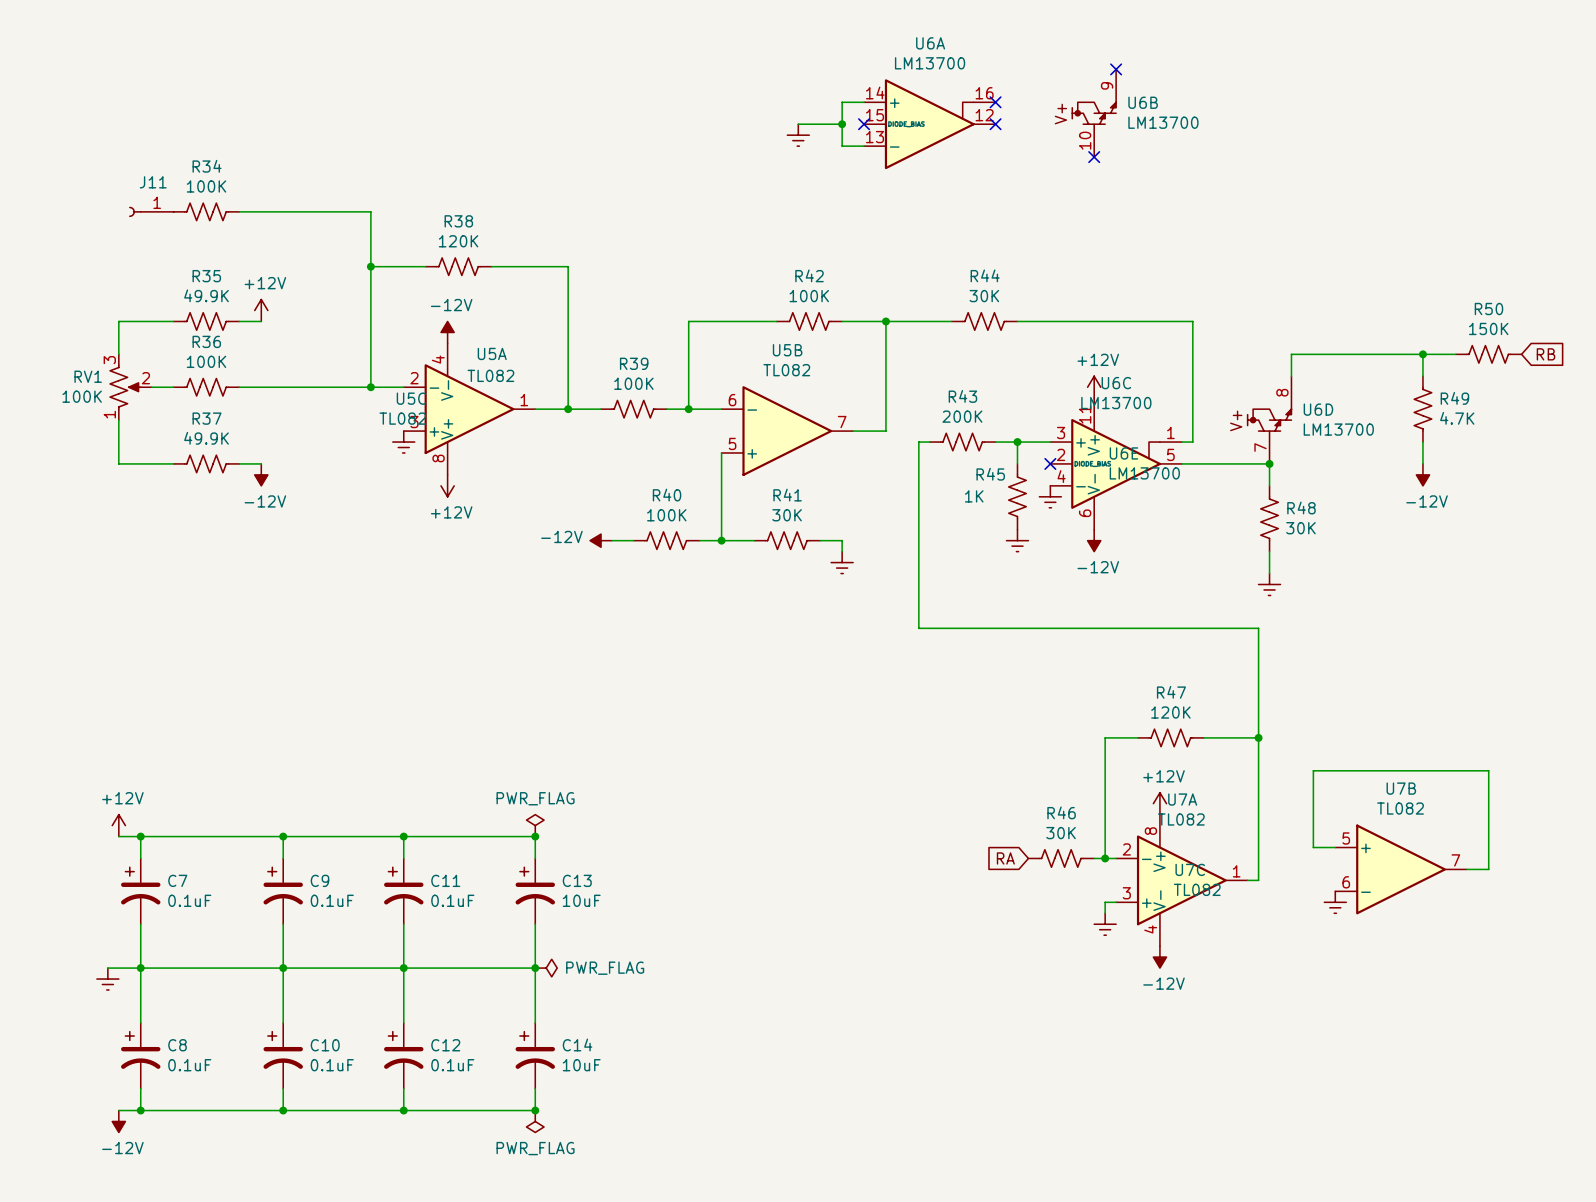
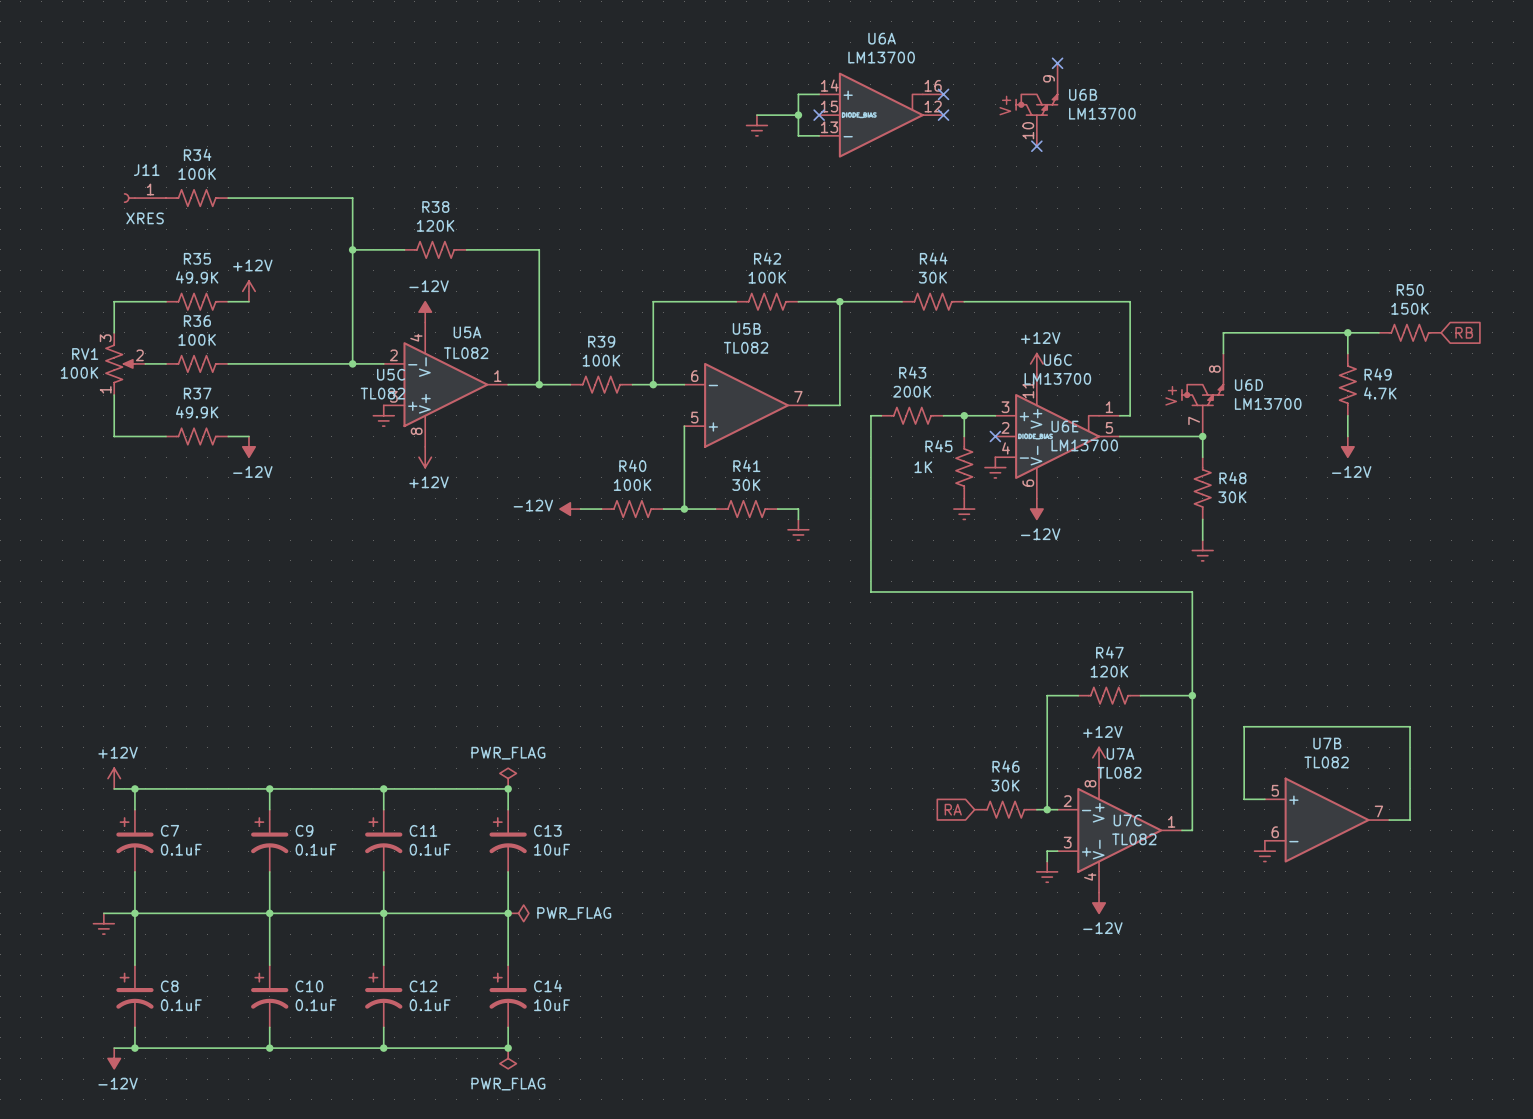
J11 value: none -> XRES (145, 218)

